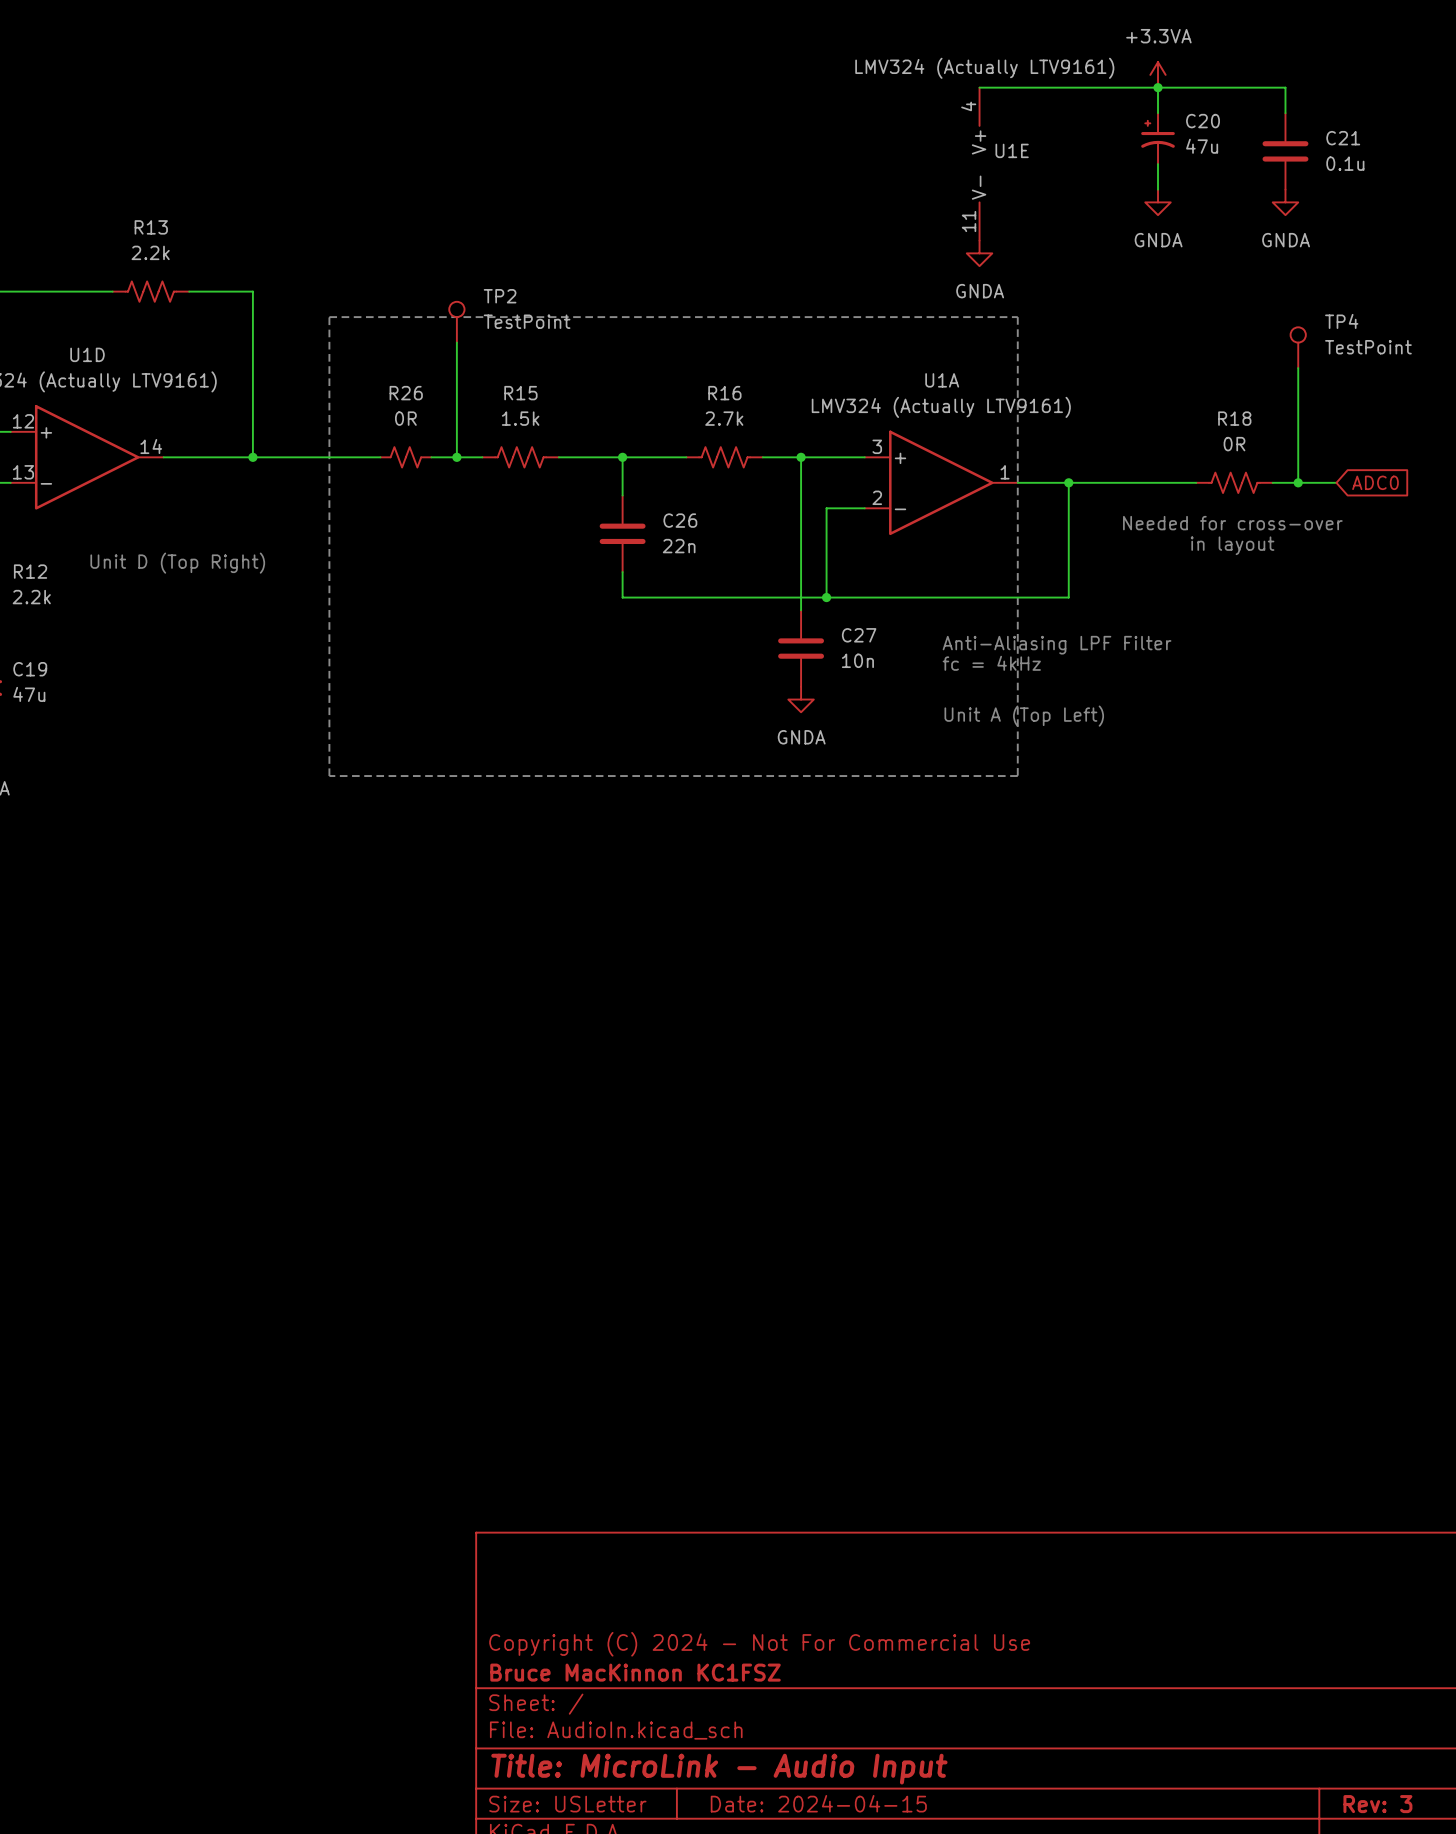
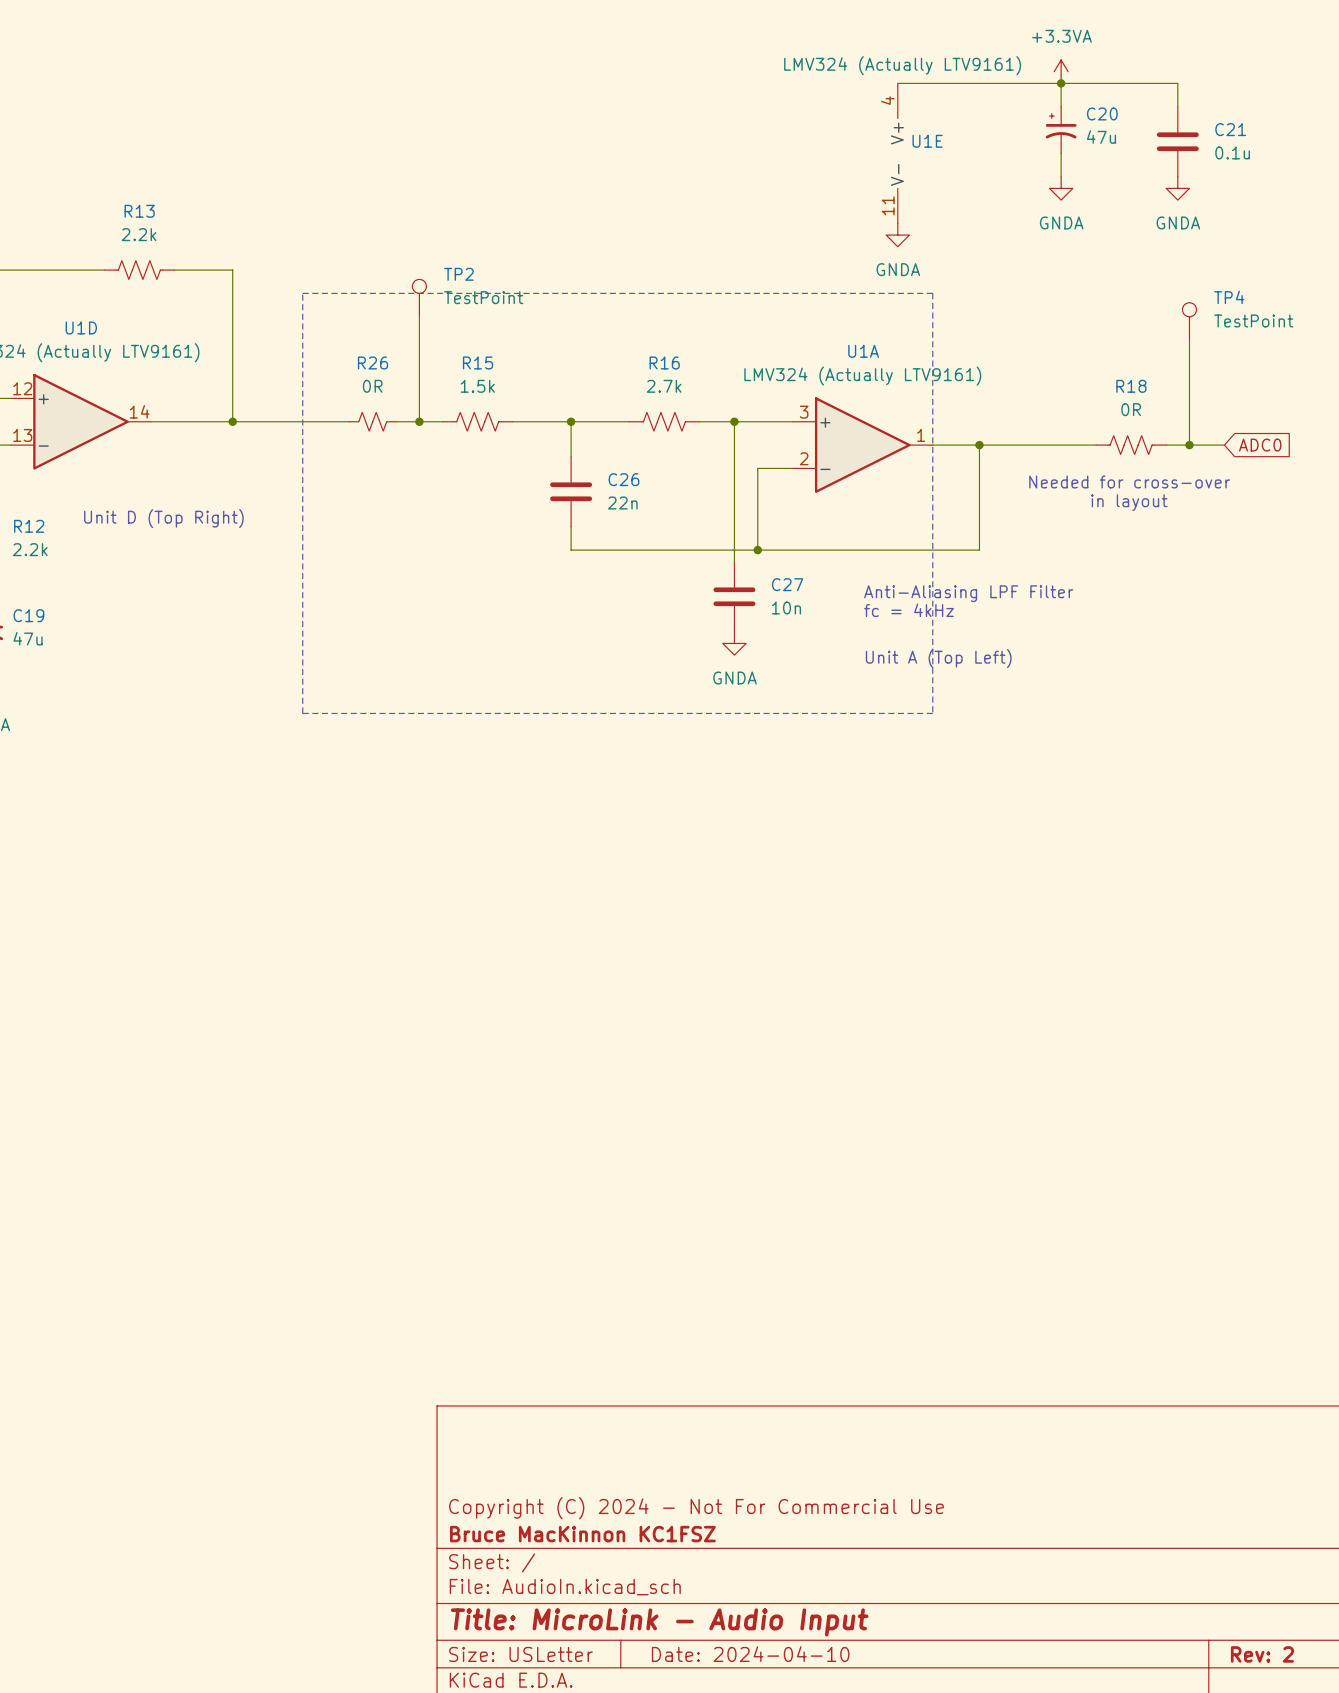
title block: Date: 2024-04-15 (818, 1803) -> Date: 2024-04-10 (750, 1654)
title block: Rev: 3 (1377, 1804) -> Rev: 2 (1262, 1654)

